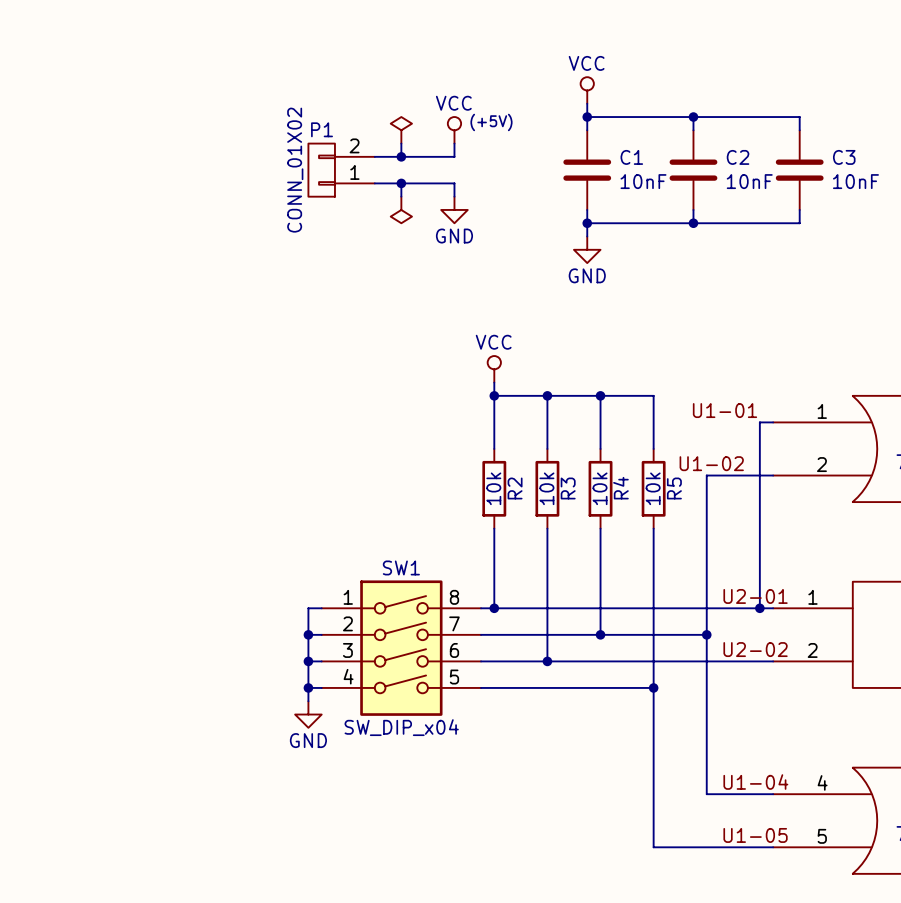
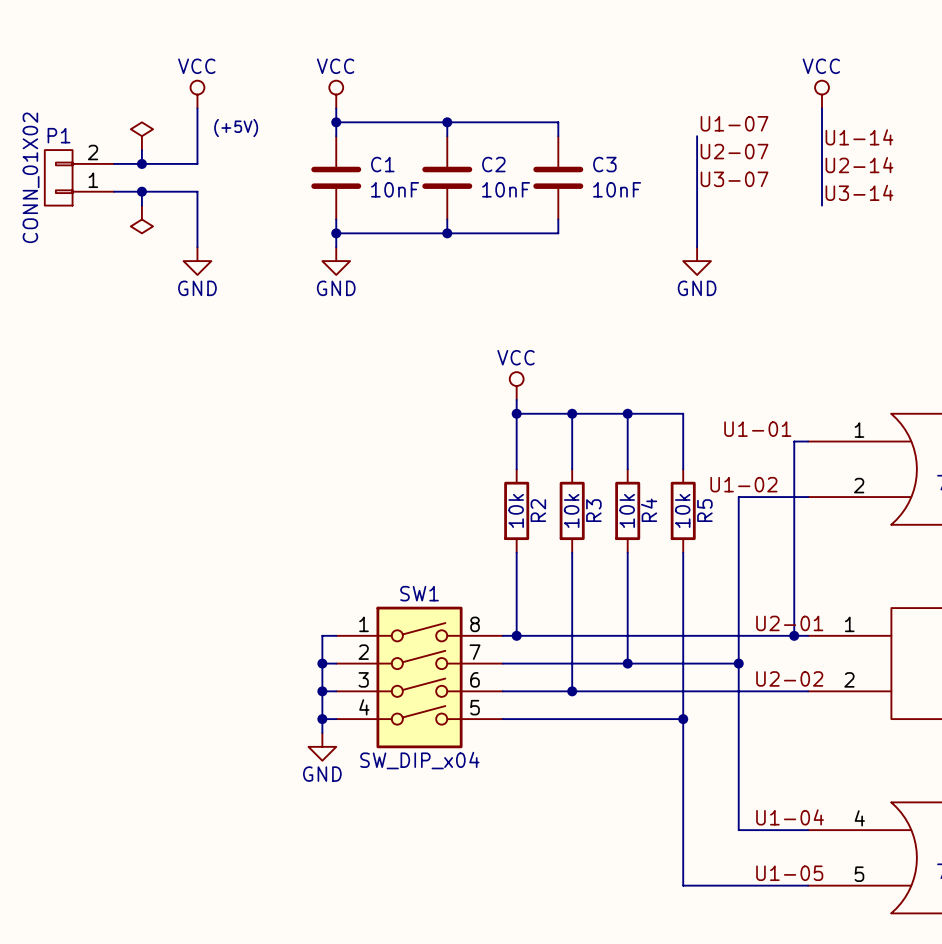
power symbol: none -> VCC (197, 94)
power symbol: none -> VCC (336, 94)
power symbol: VCC (587, 90) -> none
power symbol: none -> VCC (822, 94)
wire: none -> (197, 108) (197, 163) (114, 163)
wire: none -> (336, 108) (336, 136)
wire: (587, 103) (587, 130) -> none
wire: none -> (822, 108) (822, 205)
wire: none -> (336, 122) (558, 122) (558, 136)
junction: none -> (336, 122)
junction: none -> (447, 122)
wire: (587, 117) (799, 117) (799, 130) -> none
junction: (587, 117) -> none
wire: (693, 117) (693, 130) -> none
junction: (693, 117) -> none
label: none -> U1-07 (734, 123)
text: none -> (+5V) (236, 128)
text: (+5V) (491, 122) -> none
power symbol: none -> (141, 136)
power symbol: (401, 130) -> none
power symbol: VCC (454, 130) -> none
wire: none -> (697, 136) (697, 247)
label: none -> U1-14 (859, 137)
wire: none -> (141, 150) (141, 163)
wire: (401, 143) (401, 156) -> (447, 122) (447, 136)
wire: (454, 143) (454, 156) (374, 156) -> none
label: none -> U2-07 (734, 151)
junction: none -> (141, 163)
junction: (401, 156) -> none
label: none -> U2-14 (859, 165)
P1 position: (341, 170) -> (79, 177)
C1 position: (587, 170) -> (336, 177)
C2 position: (693, 170) -> (447, 177)
C3 position: (799, 170) -> (558, 177)
label: none -> U3-07 (734, 179)
wire: none -> (114, 191) (197, 191) (197, 247)
wire: none -> (141, 191) (141, 205)
junction: none -> (141, 191)
wire: (374, 183) (454, 183) (454, 196) -> none
wire: (401, 183) (401, 196) -> (447, 219) (447, 233)
junction: (401, 183) -> none
label: none -> U3-14 (859, 192)
power symbol: none -> (141, 219)
wire: none -> (336, 219) (336, 247)
power symbol: (401, 209) -> none
power symbol: GND (454, 209) -> none
wire: none -> (558, 219) (558, 233) (336, 233)
wire: (587, 209) (587, 236) -> none
wire: (693, 209) (693, 223) -> none
wire: (799, 209) (799, 223) (587, 223) -> none
junction: none -> (336, 233)
junction: none -> (447, 233)
junction: (587, 223) -> none
junction: (693, 223) -> none
power symbol: none -> GND (197, 261)
power symbol: none -> GND (336, 261)
power symbol position: GND (587, 249) -> GND (697, 261)

